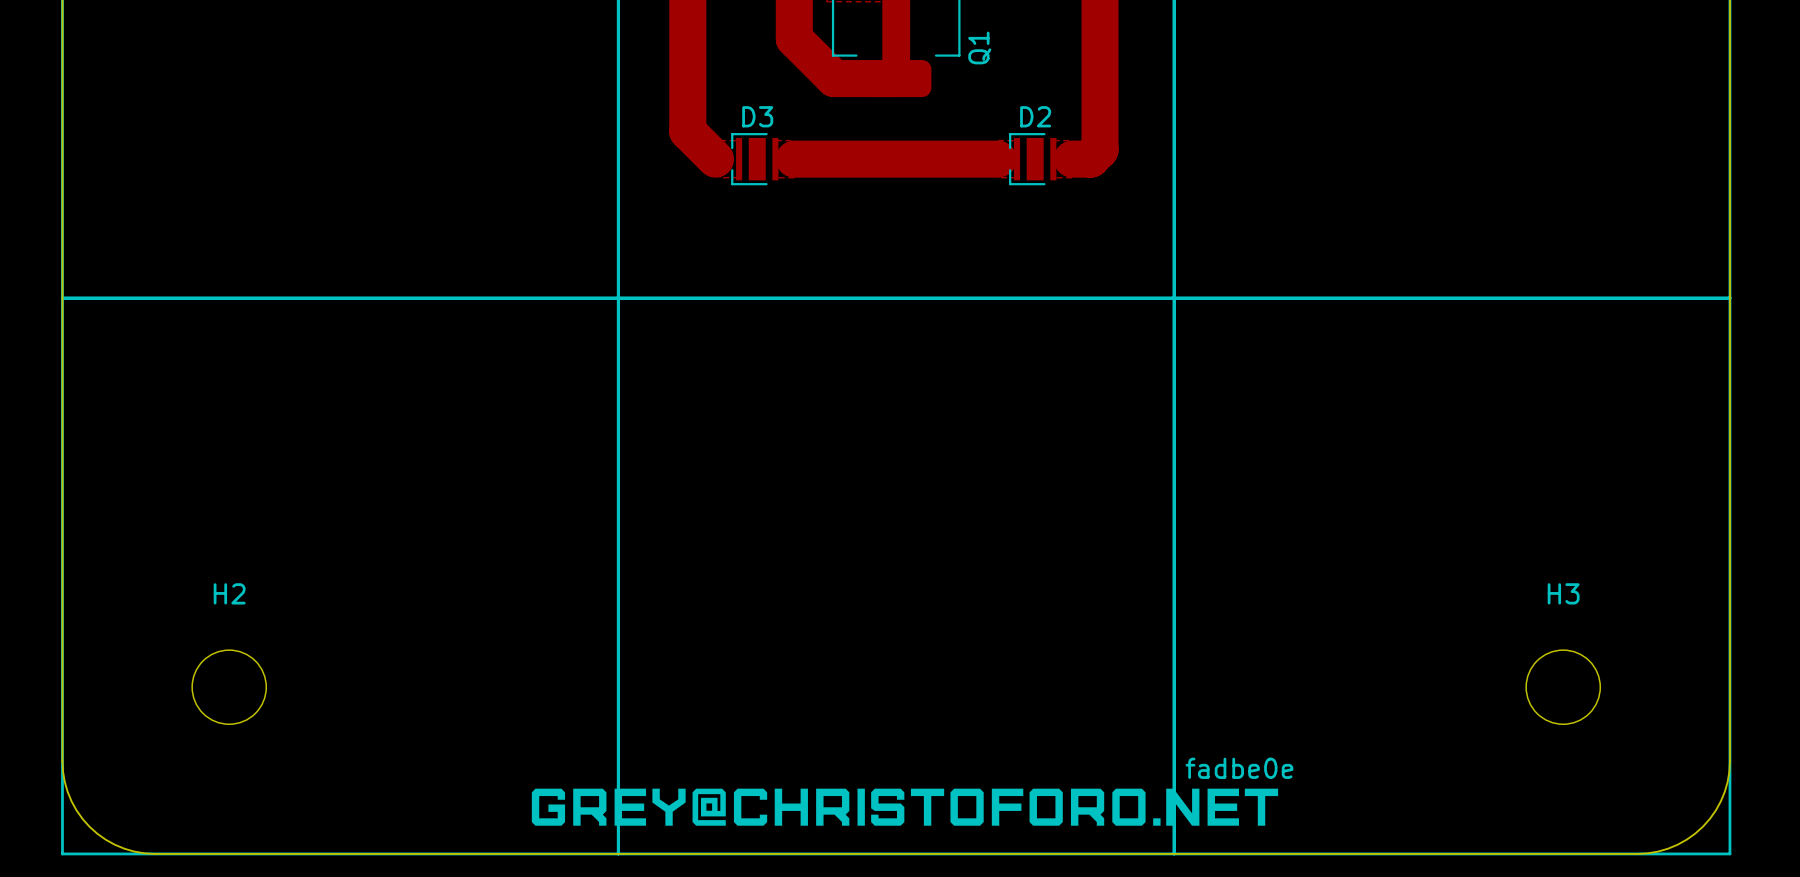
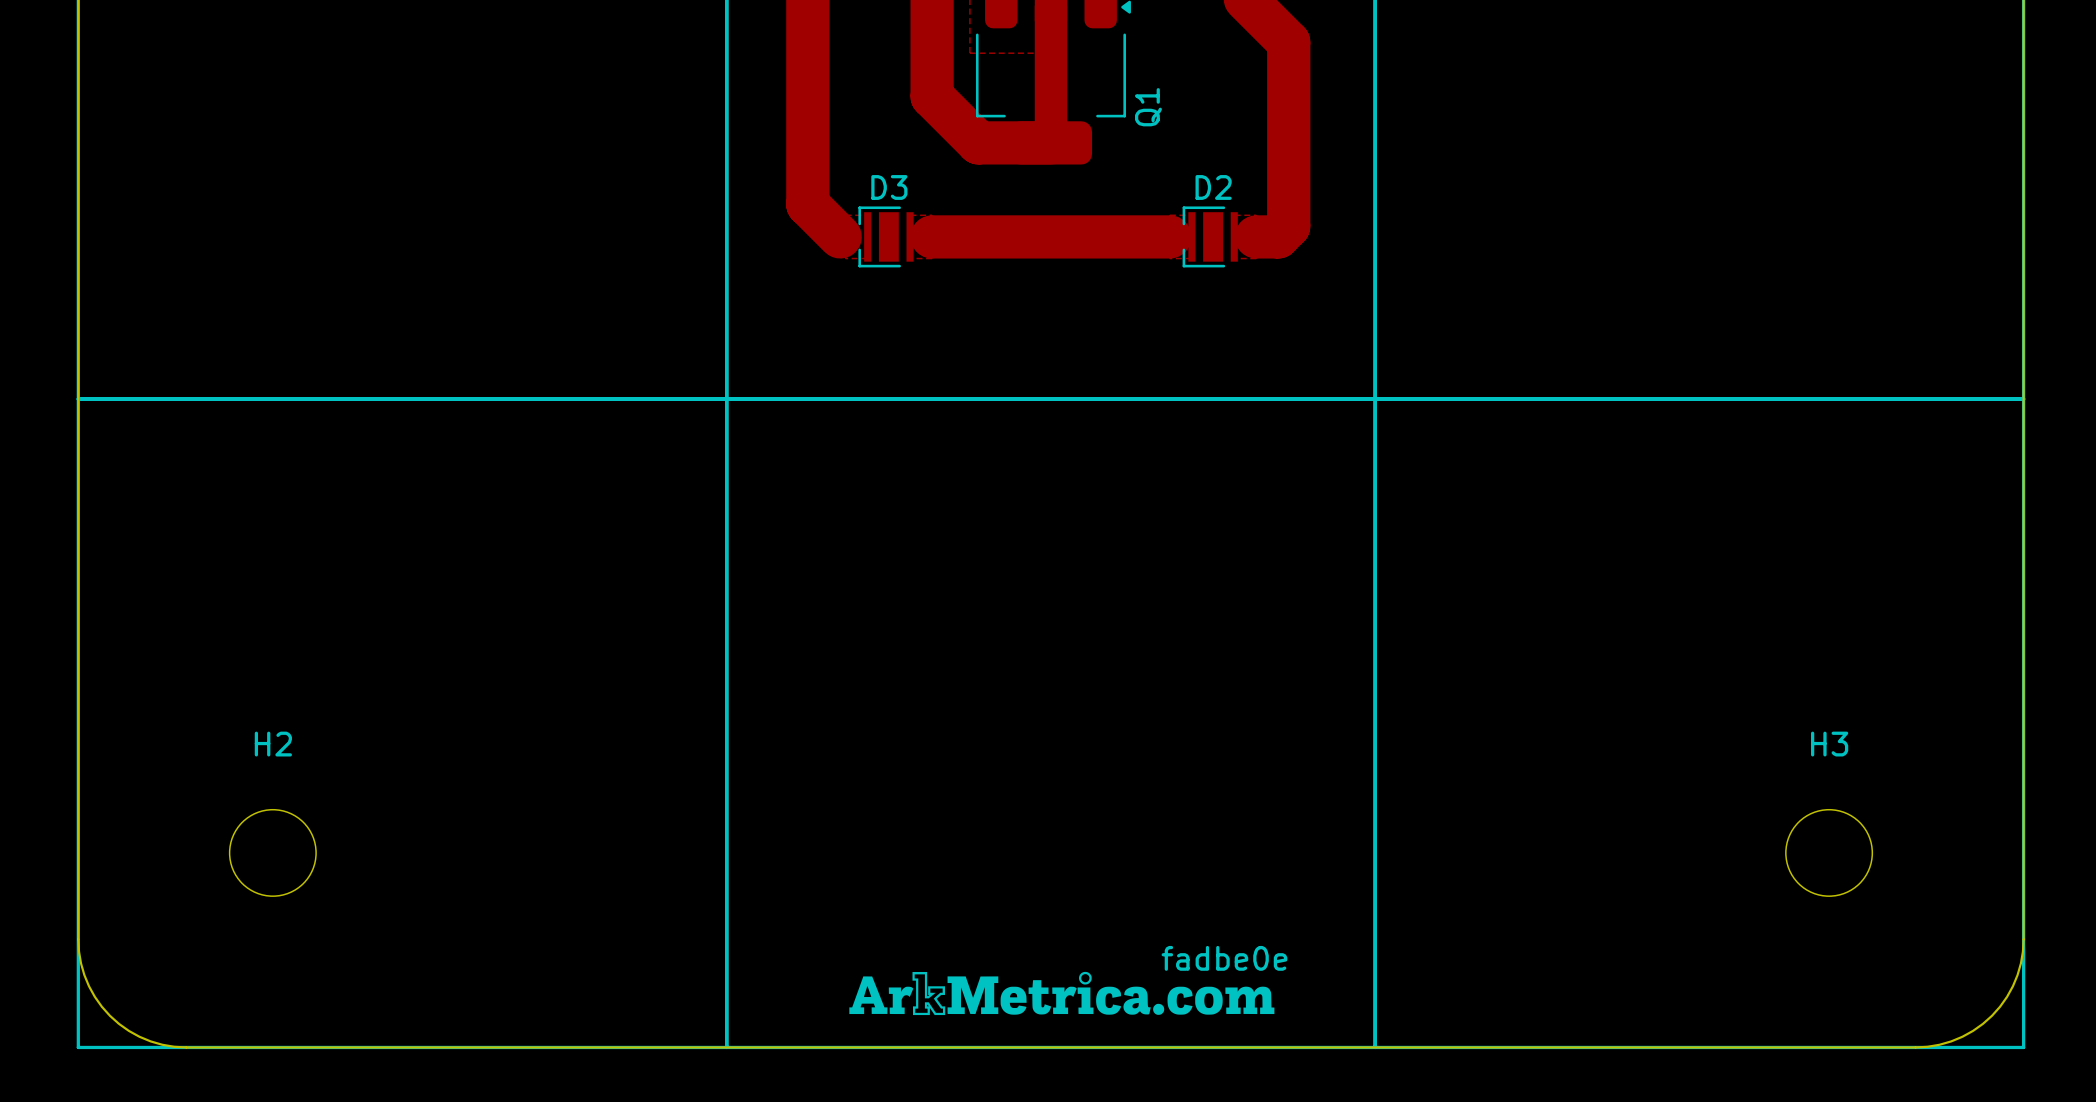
text position: fadbe0e (1239, 768) -> fadbe0e (1224, 958)
drawing shape: [531, 788, 1279, 826] -> [849, 971, 1275, 1016]

